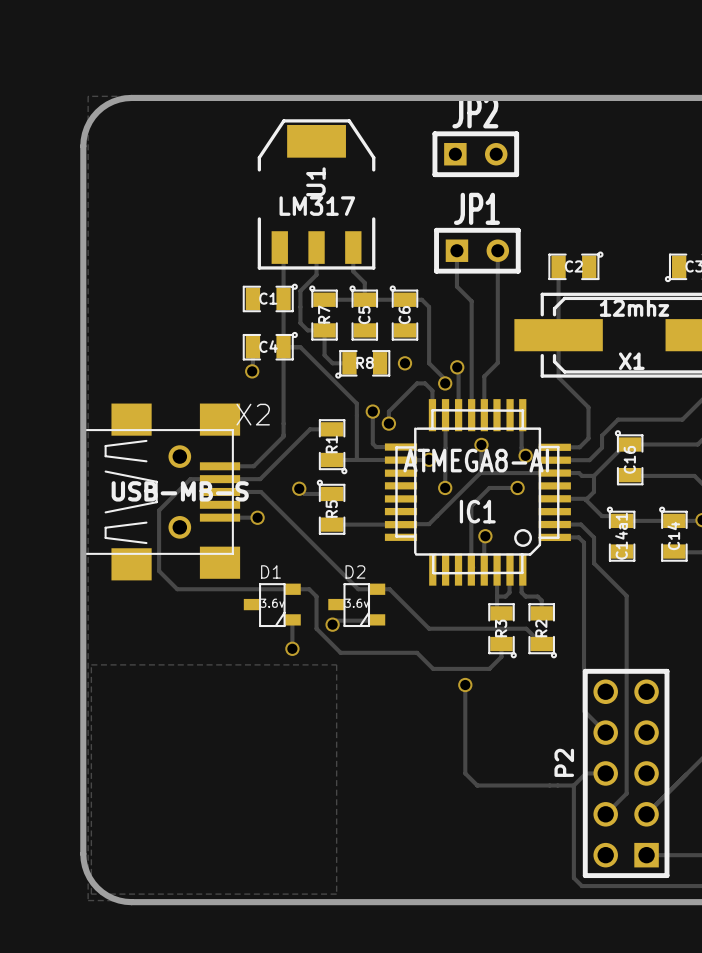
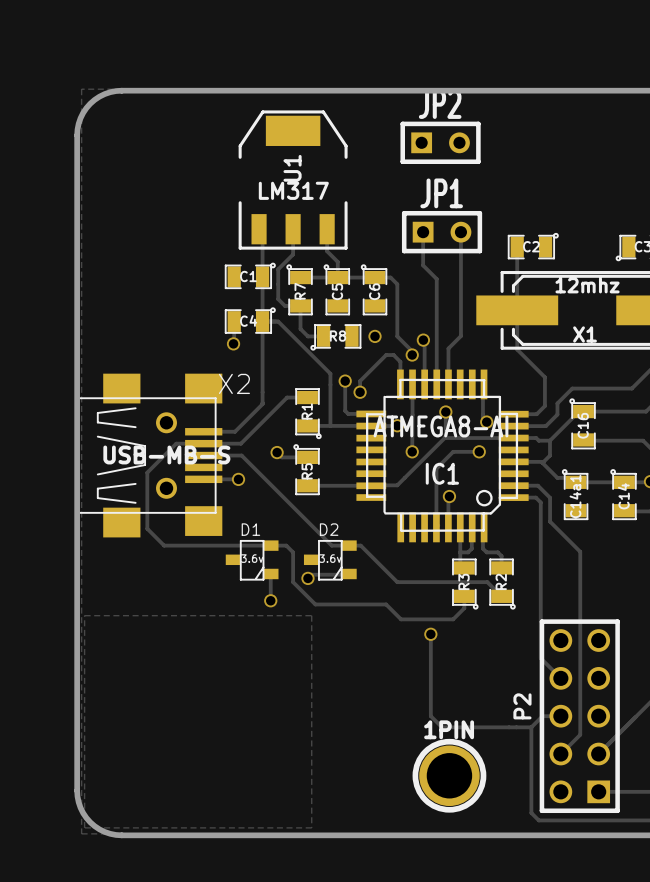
1PIN: none -> (449, 775)

